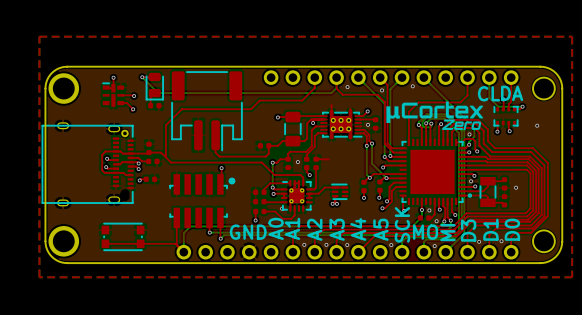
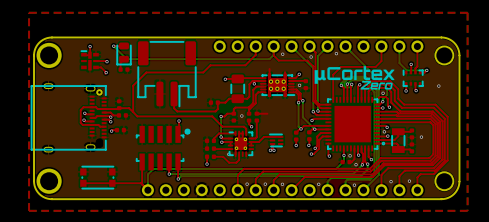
text: CL (489, 93) -> none
text: DA (512, 93) -> none
text: SCK (402, 224) -> none
text: A0 (276, 228) -> none
text: A1 (292, 228) -> none
text: A2 (314, 229) -> none
text: A3 (337, 229) -> none
text: A4 (358, 229) -> none
text: A5 (380, 229) -> none
text: D1 (490, 229) -> none
text: D0 (512, 229) -> none
text: D3 (468, 230) -> none
text: GND (248, 232) -> none
text: MO (425, 232) -> none
text: MI (447, 232) -> none

